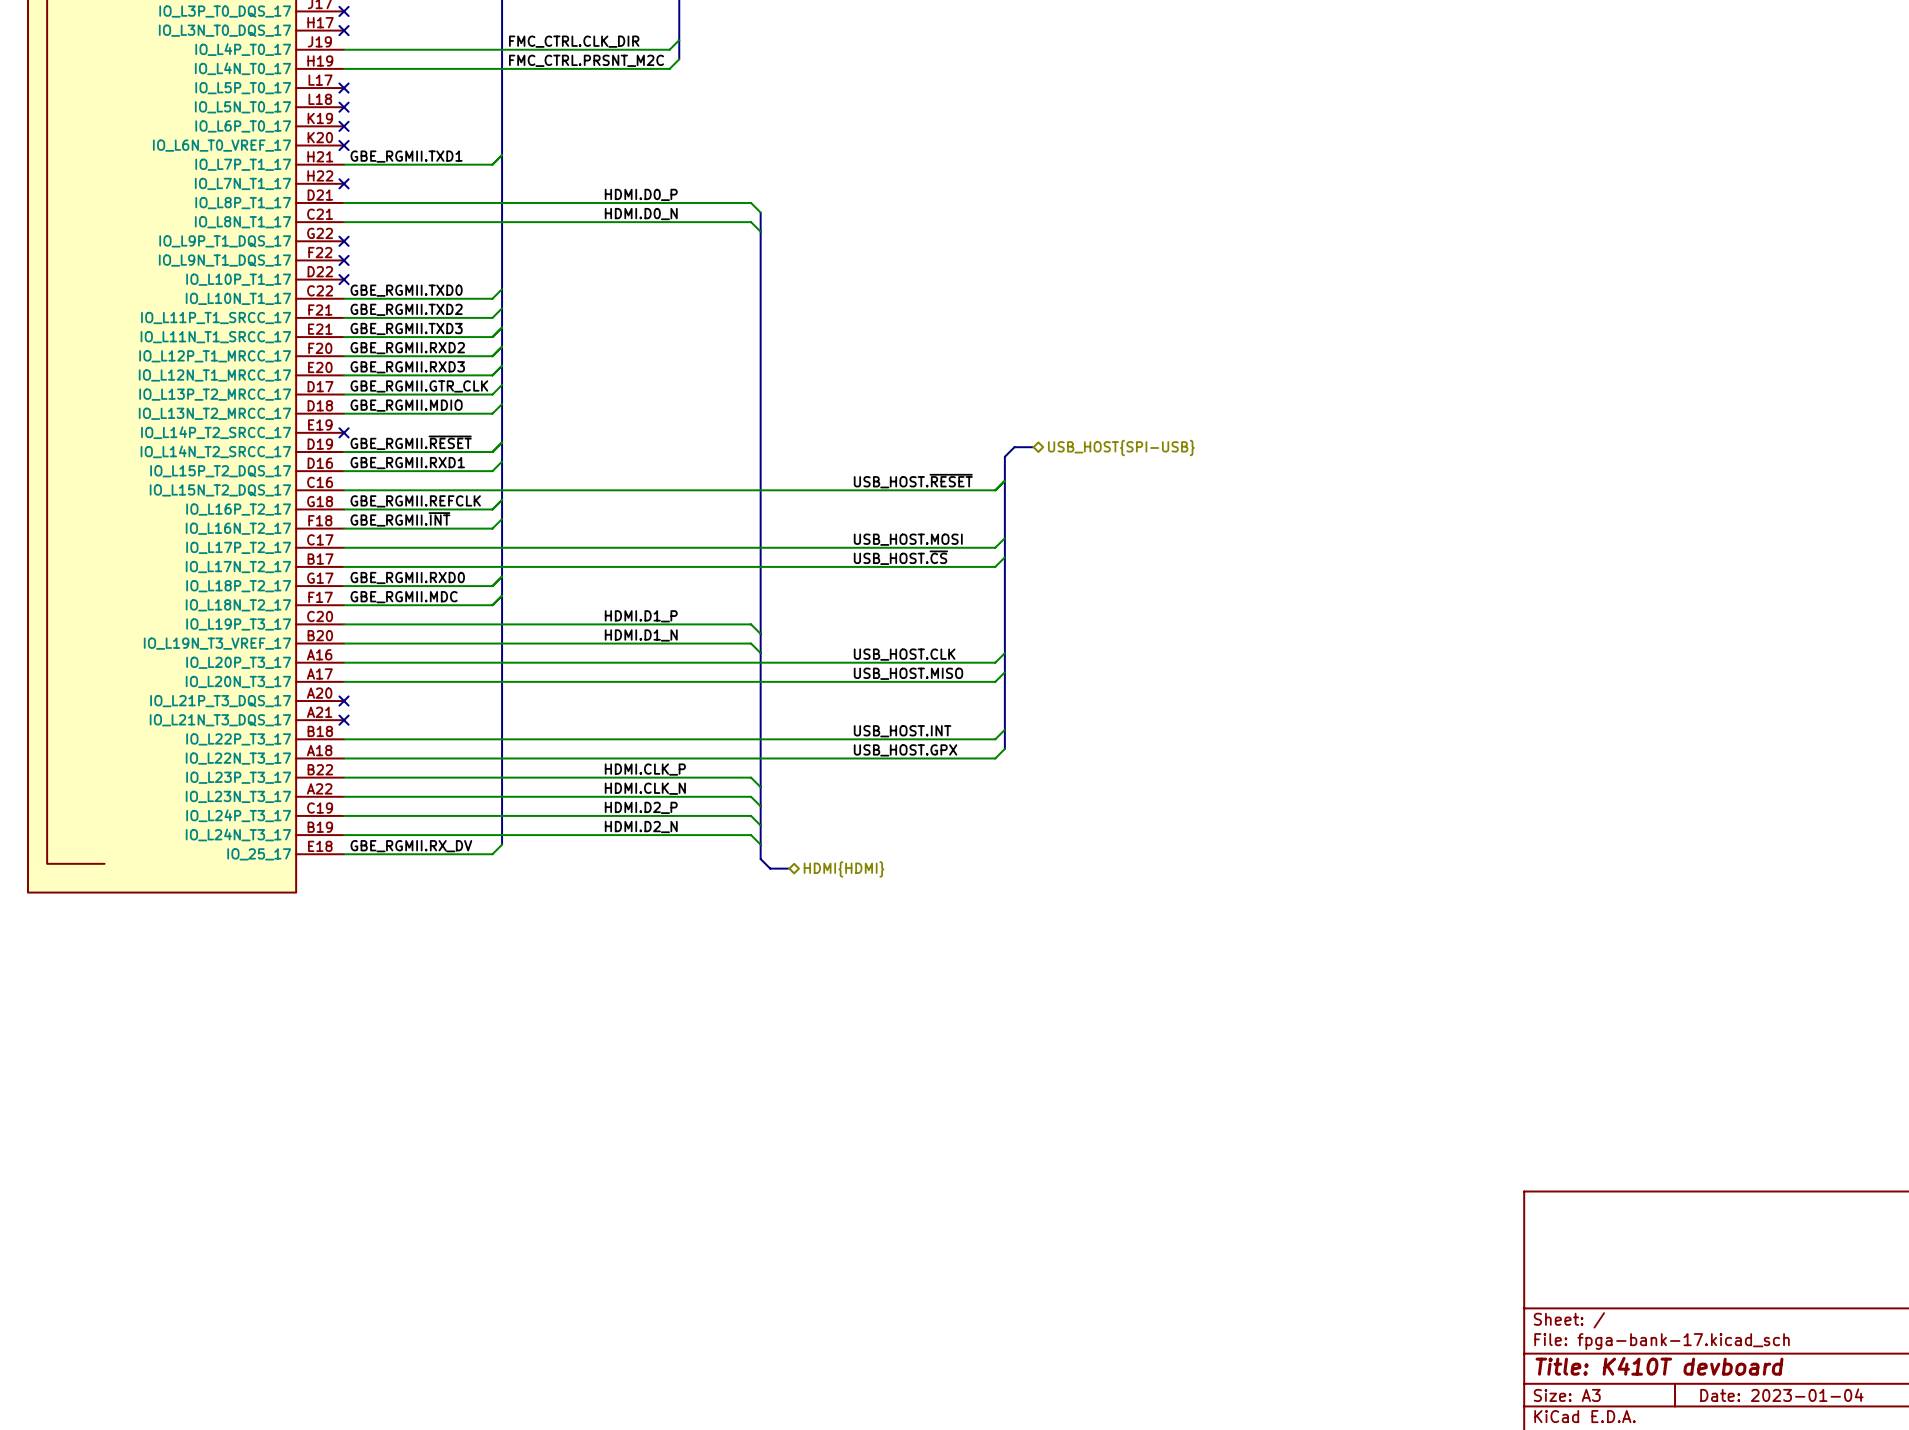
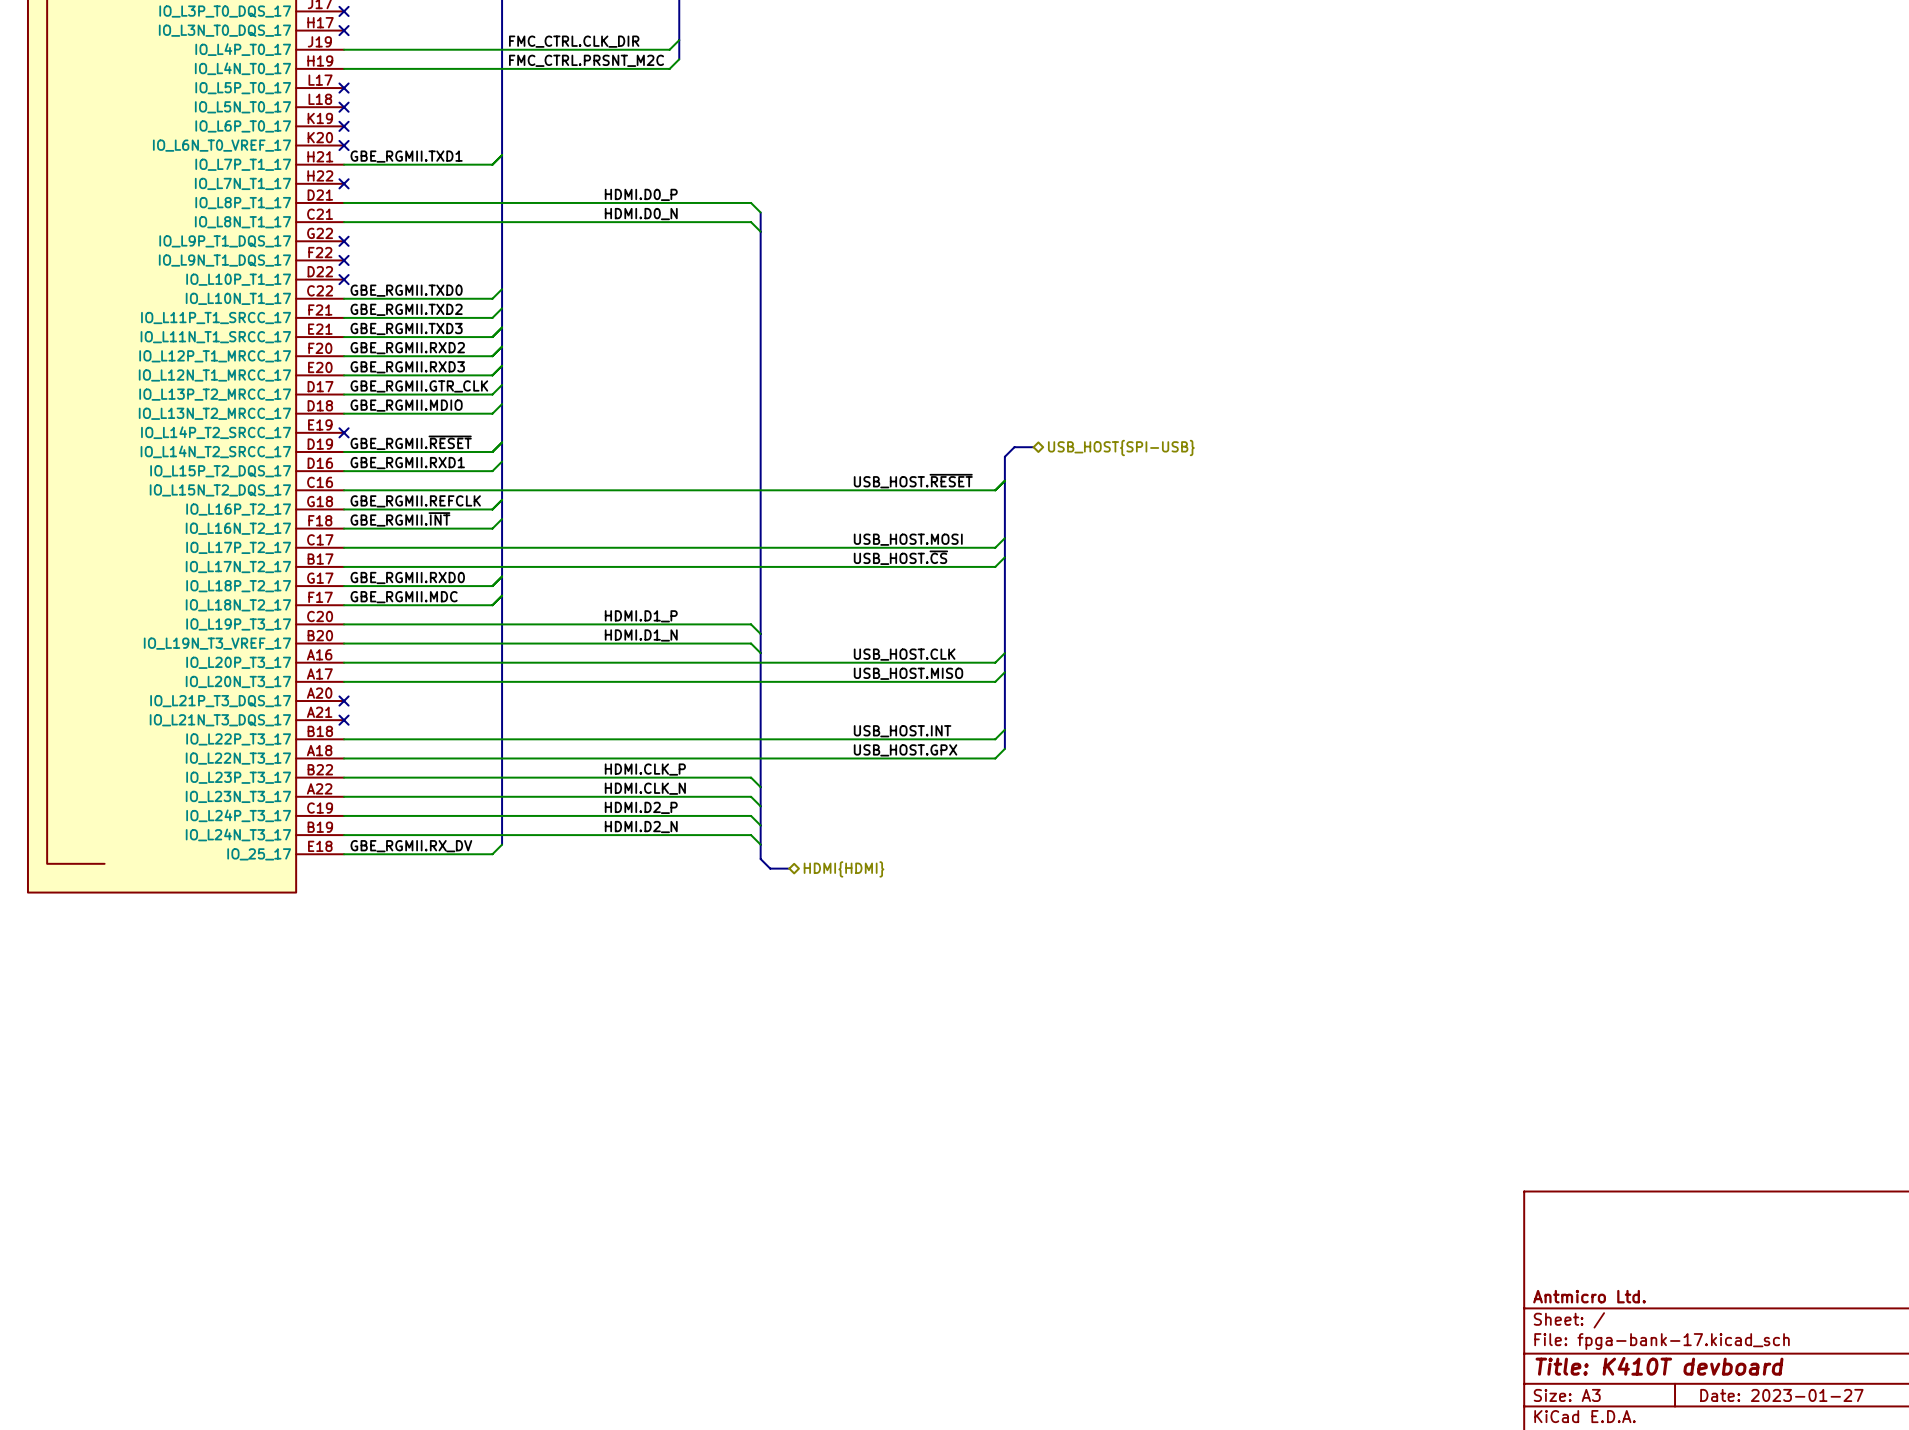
title block: none -> Antmicro Ltd. (1589, 1296)
title block: Date: 2023-01-04 (1781, 1395) -> Date: 2023-01-27 (1781, 1395)

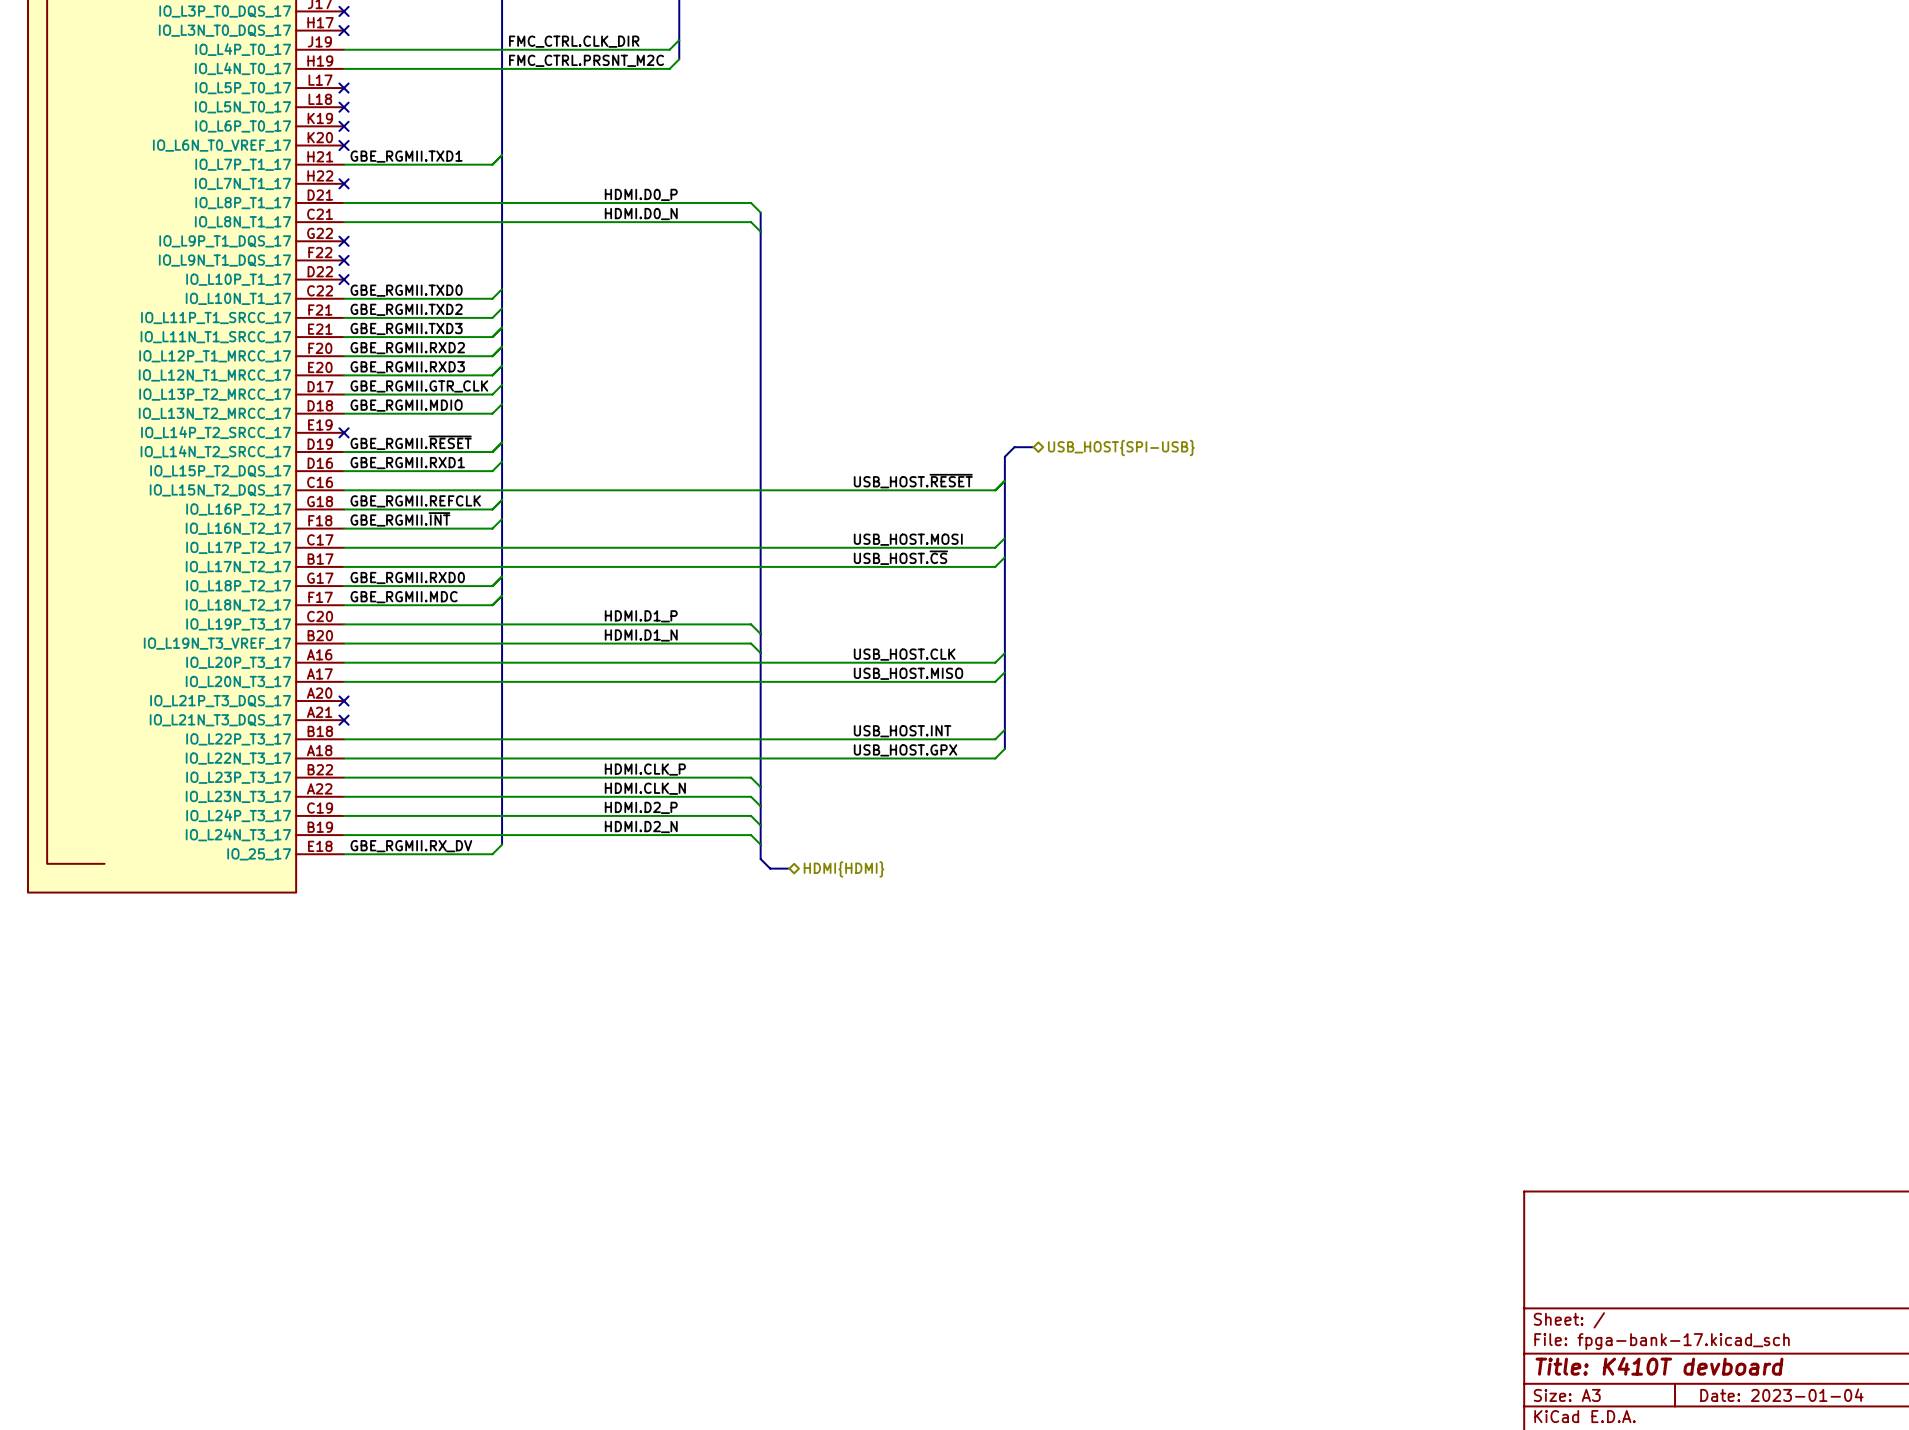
title block: Antmicro Ltd. (1589, 1296) -> none
title block: Date: 2023-01-27 (1781, 1395) -> Date: 2023-01-04 (1781, 1395)

